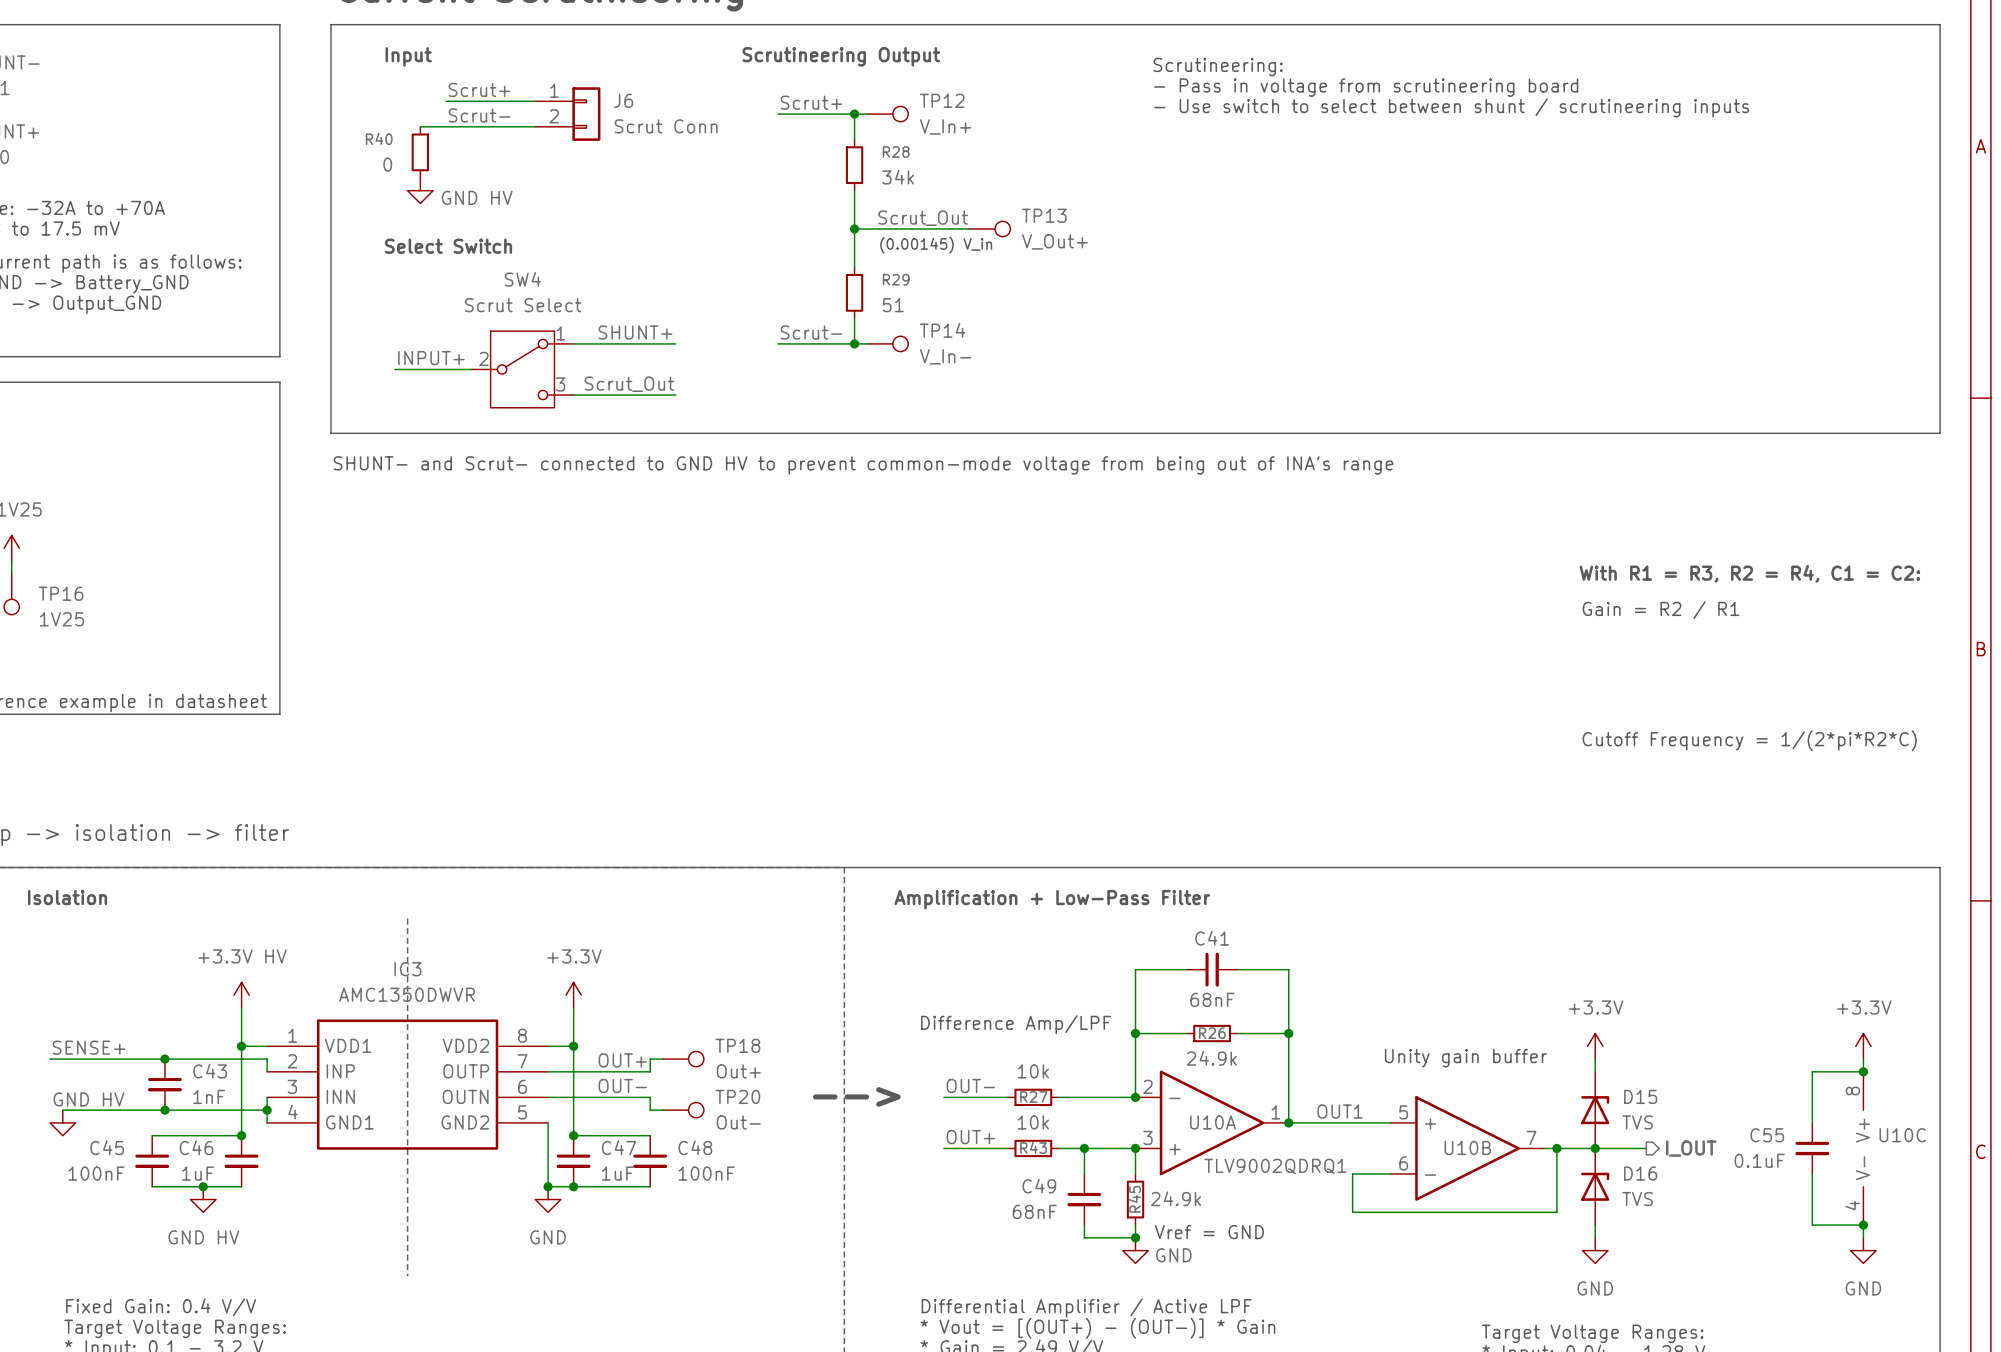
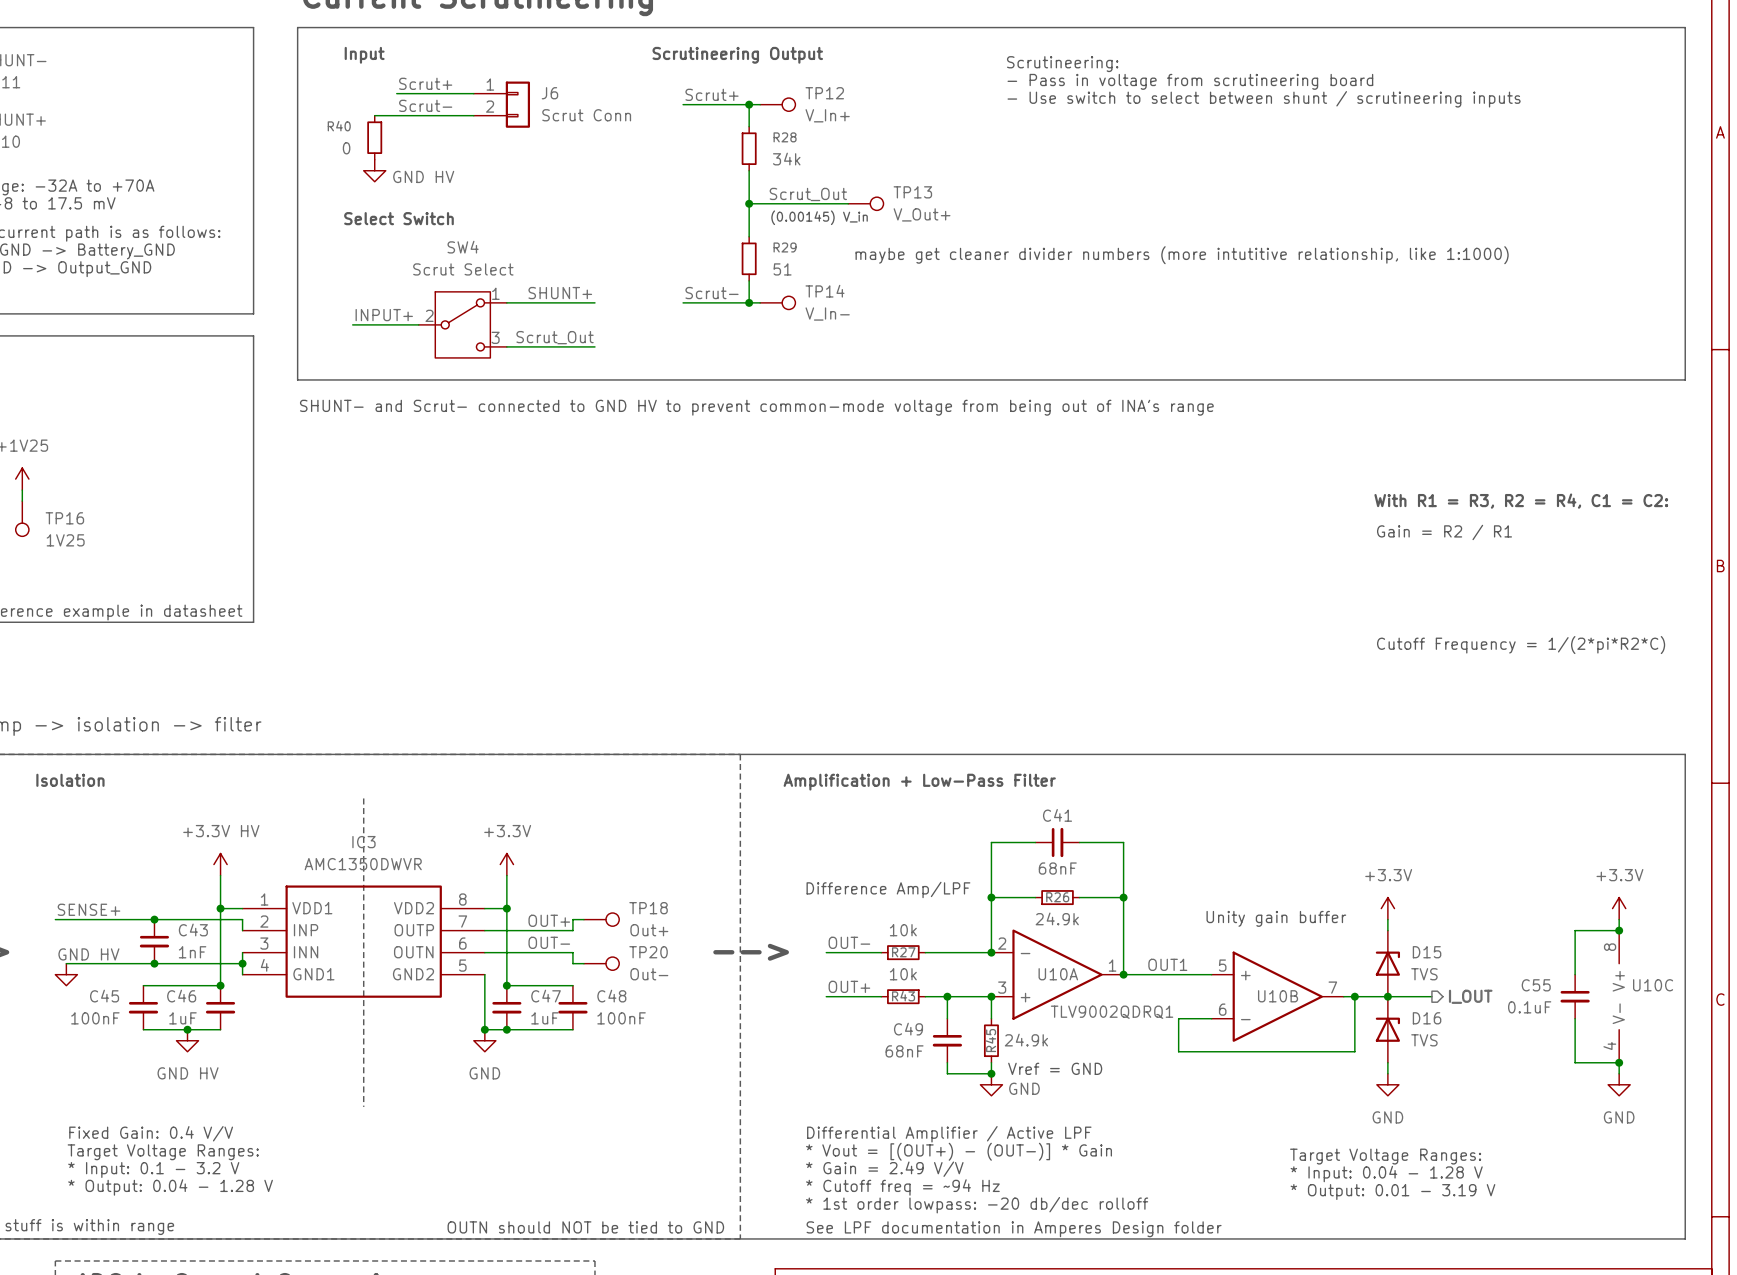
text: none -> maybe get cleaner divider numbers (more intutitive relationship, like 1:1000) (1182, 255)

